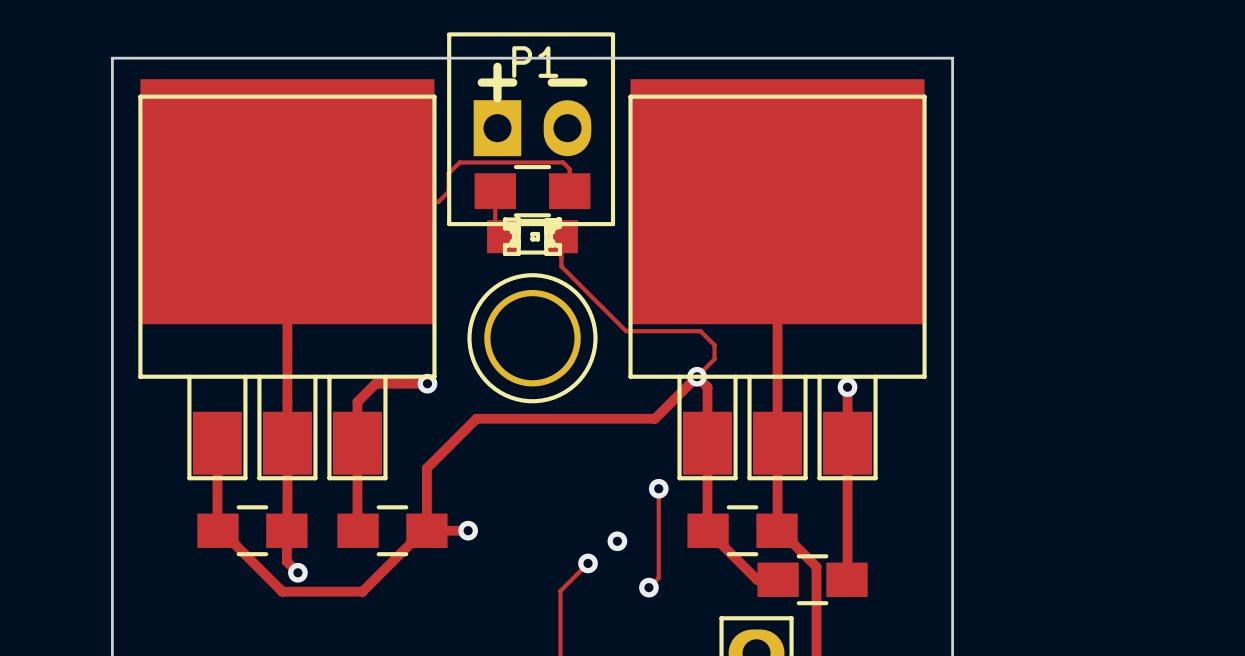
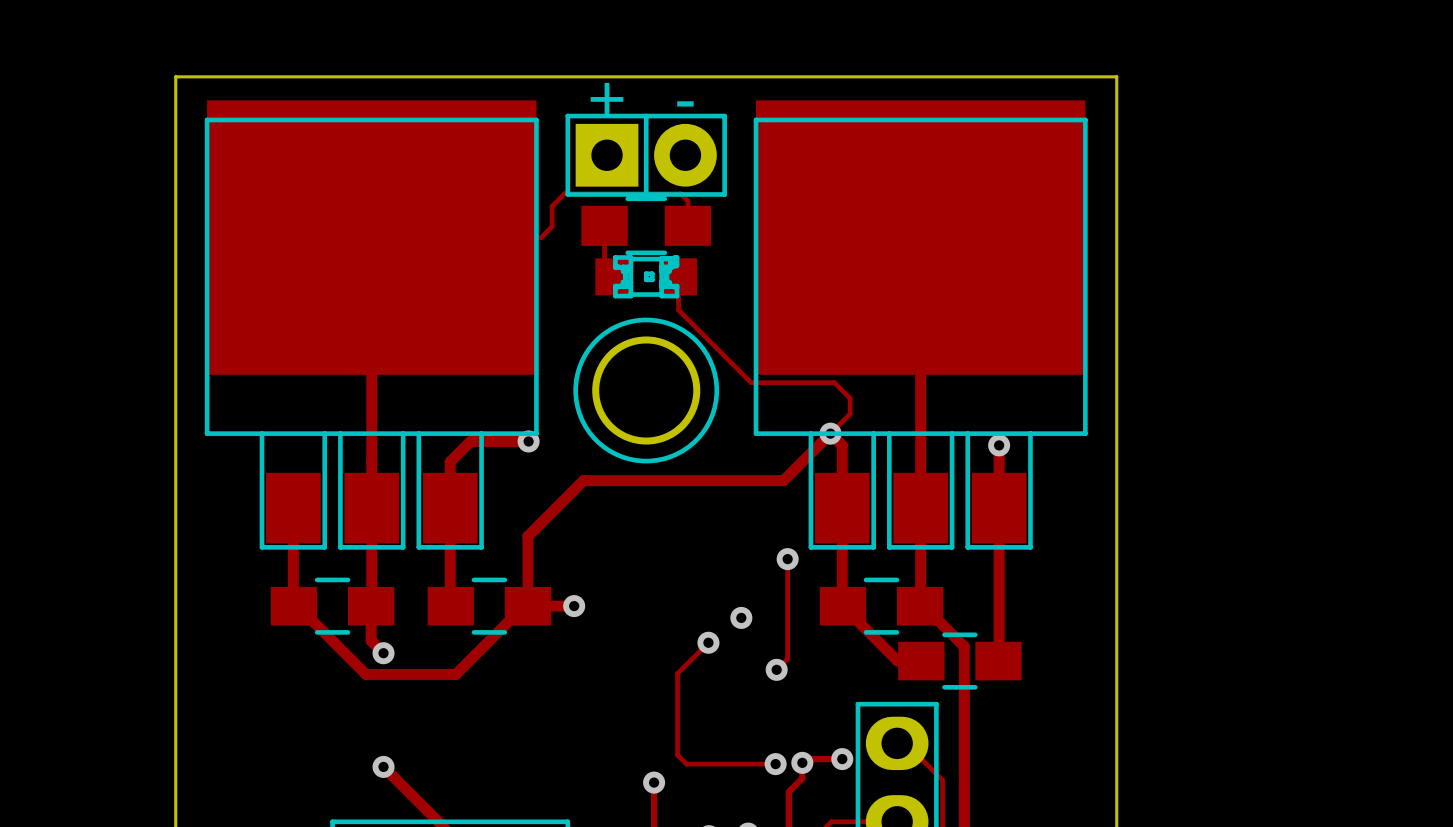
part: none -> (646, 155)
P1: (531, 129) -> none

